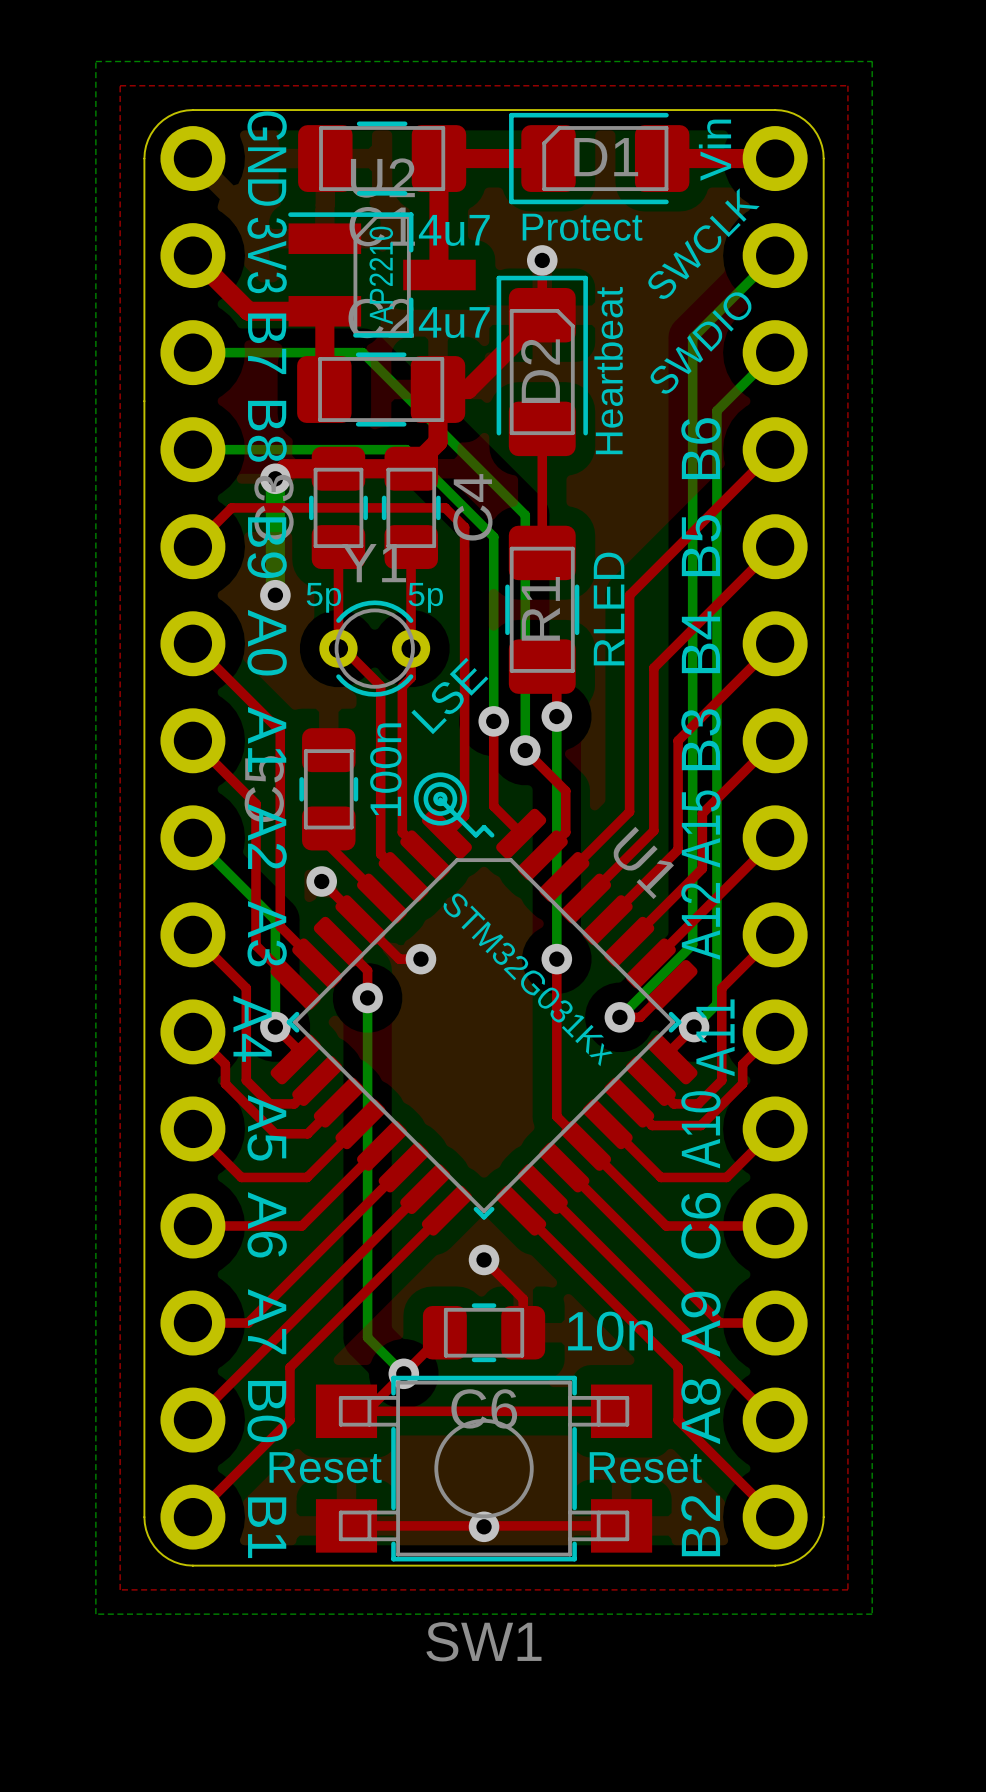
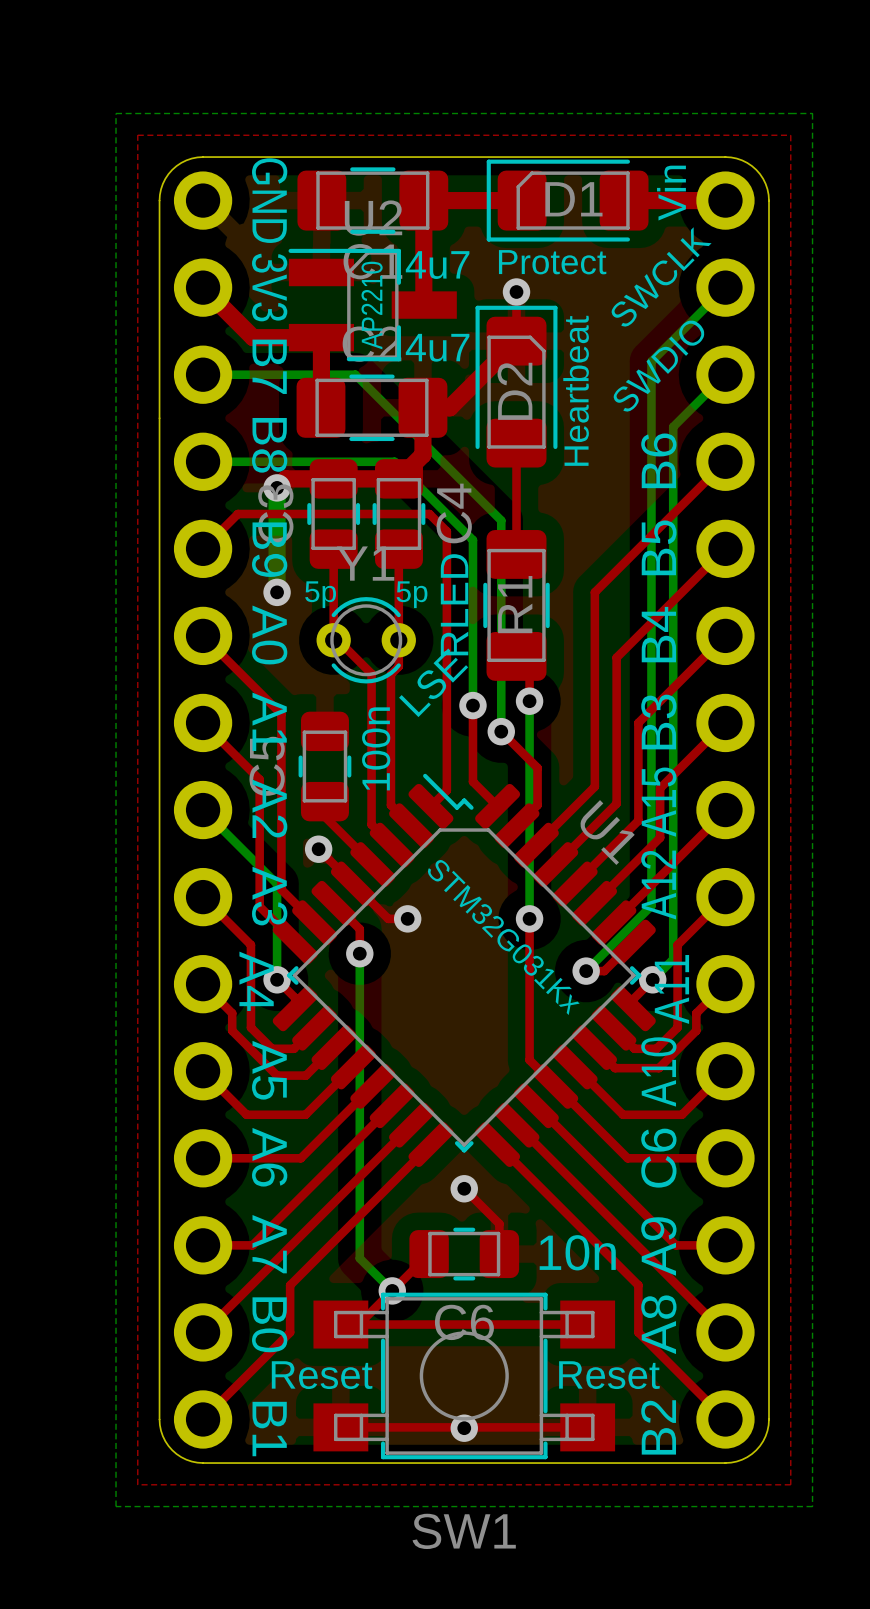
R1 value position: RLED (609, 609) -> RLED (454, 604)
drawing: [413, 772, 467, 826] -> none

